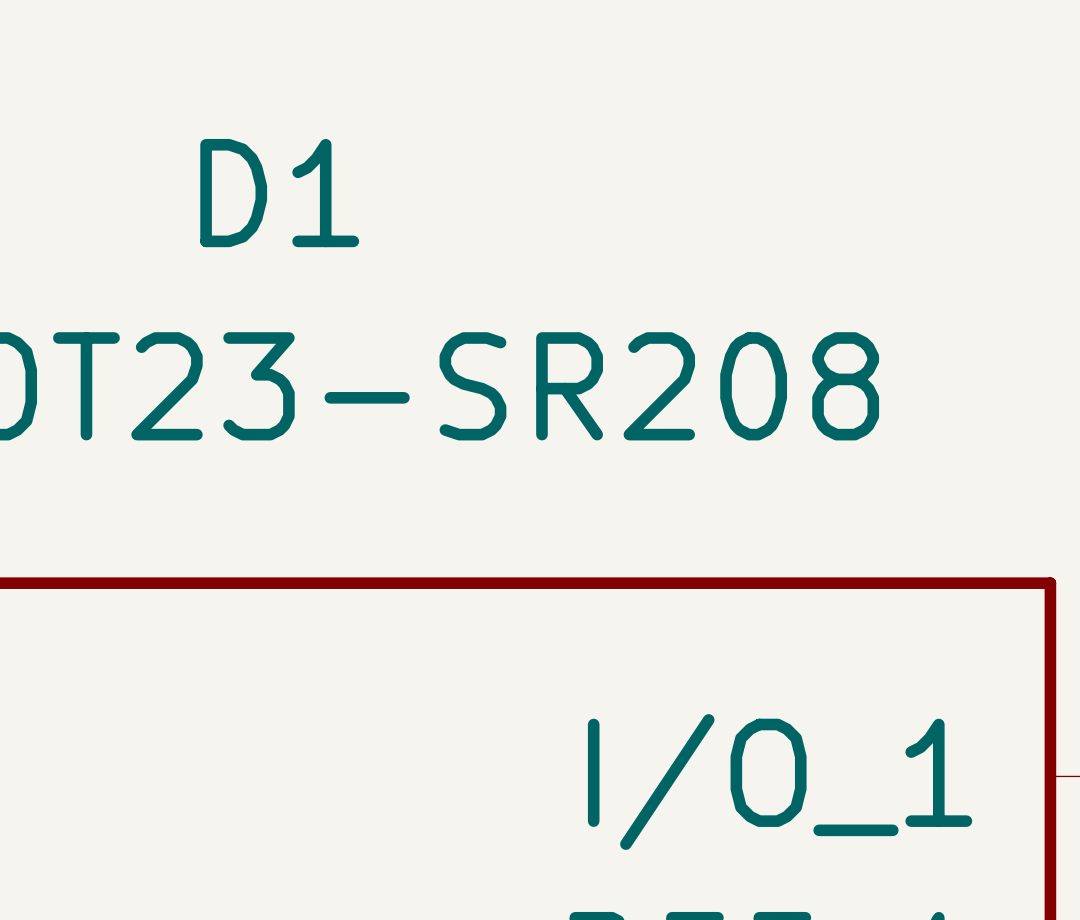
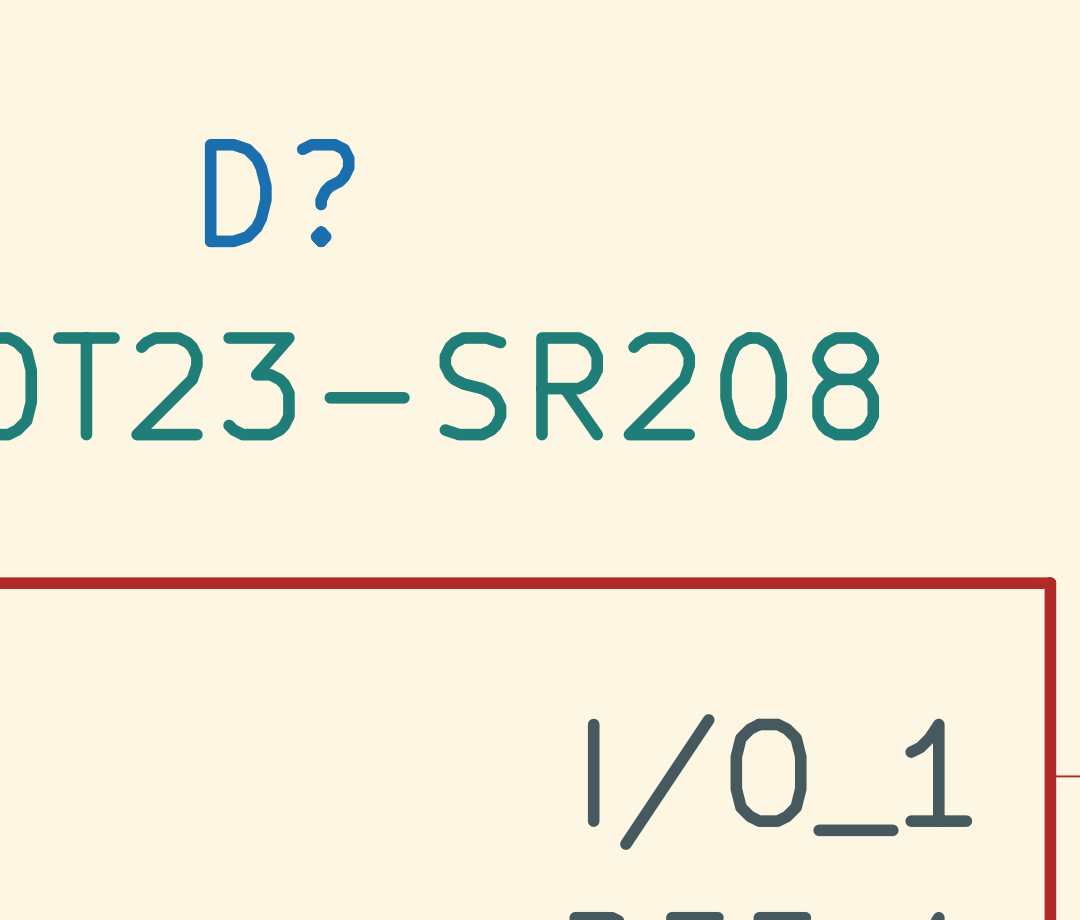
D1 name: D1 (279, 193) -> D? (279, 193)

